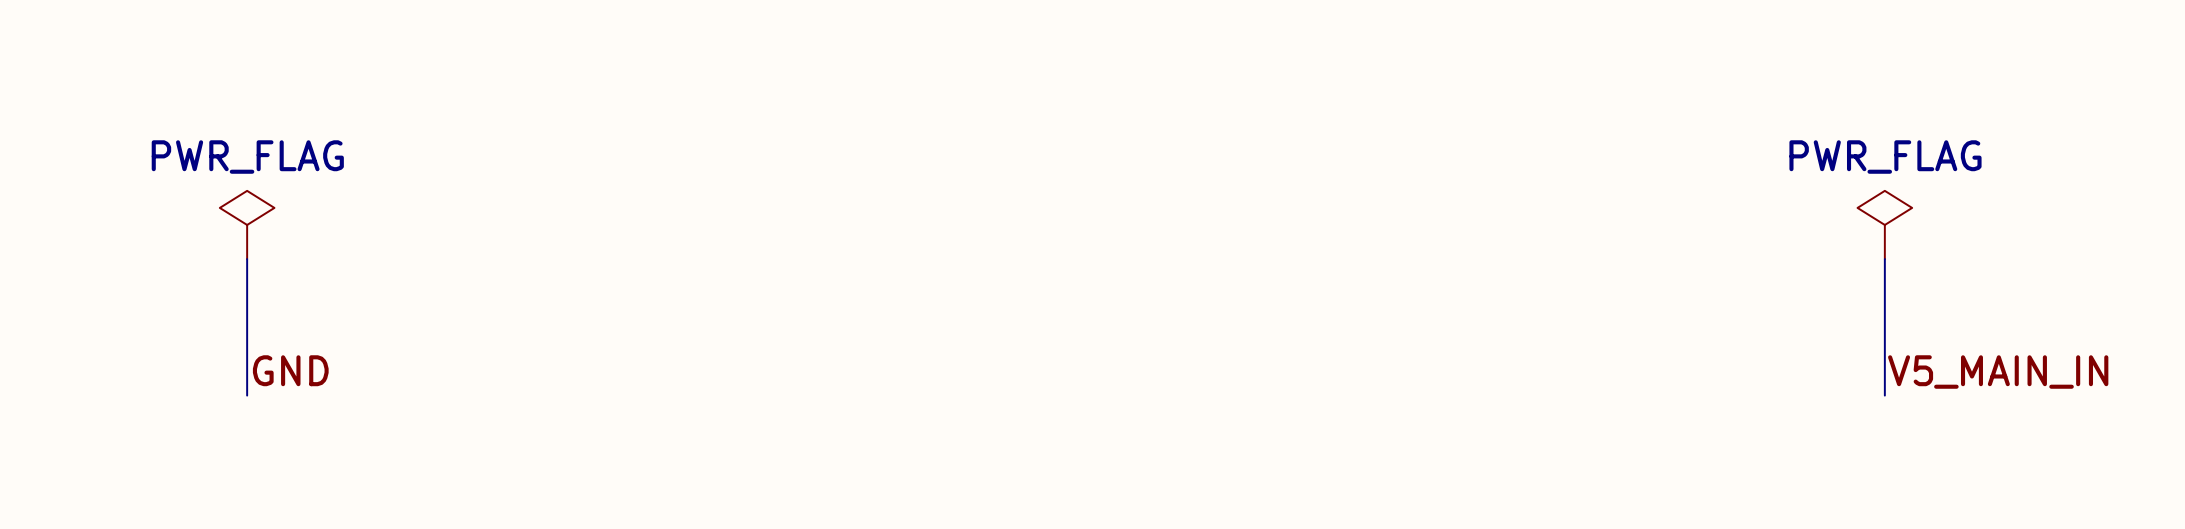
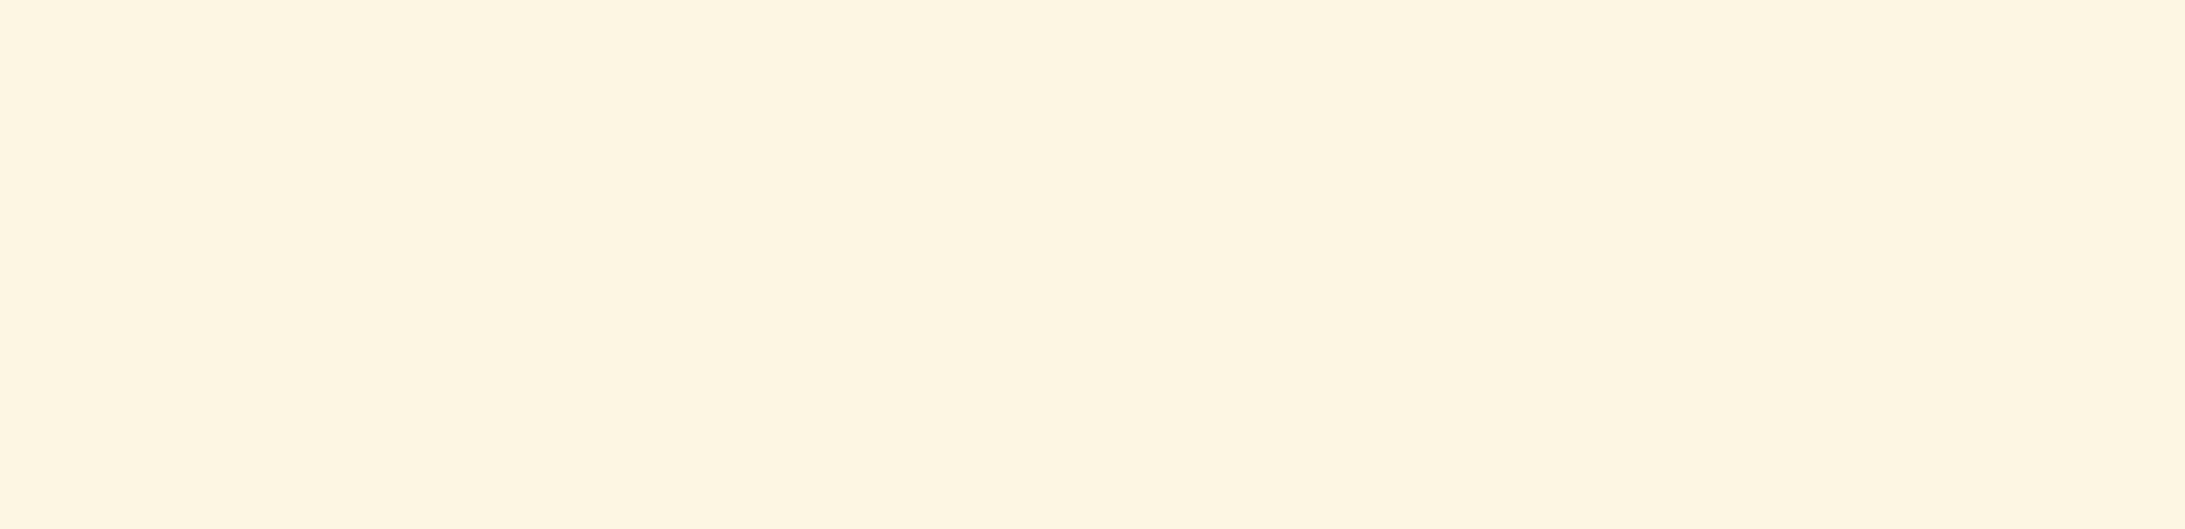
power symbol: PWR_FLAG (247, 224) -> none
power symbol: PWR_FLAG (1884, 224) -> none
wire: (247, 259) (247, 395) -> none
wire: (1884, 259) (1884, 395) -> none
label: GND (290, 370) -> none
label: V5_MAIN_IN (1998, 372) -> none

